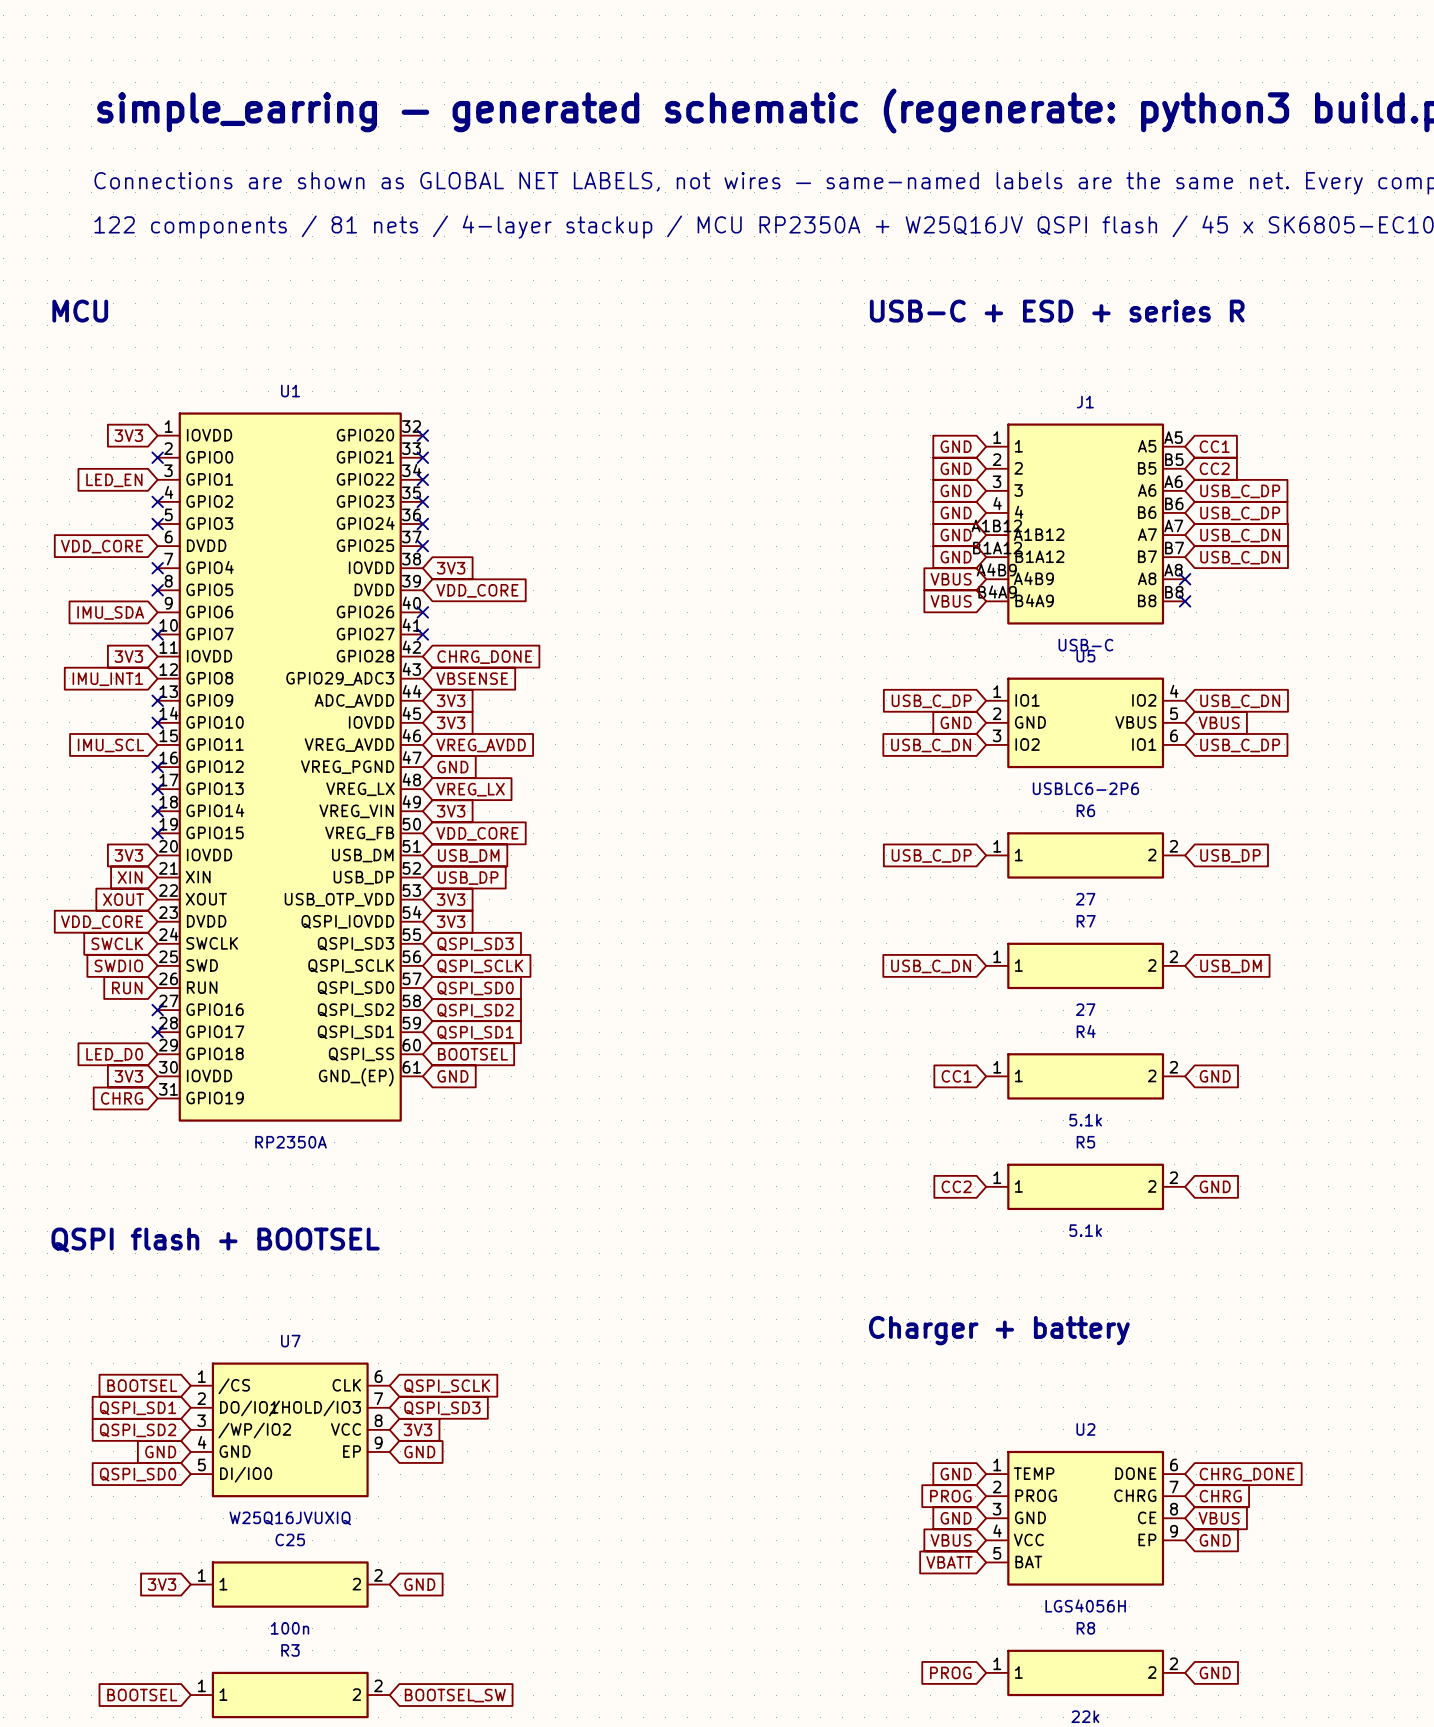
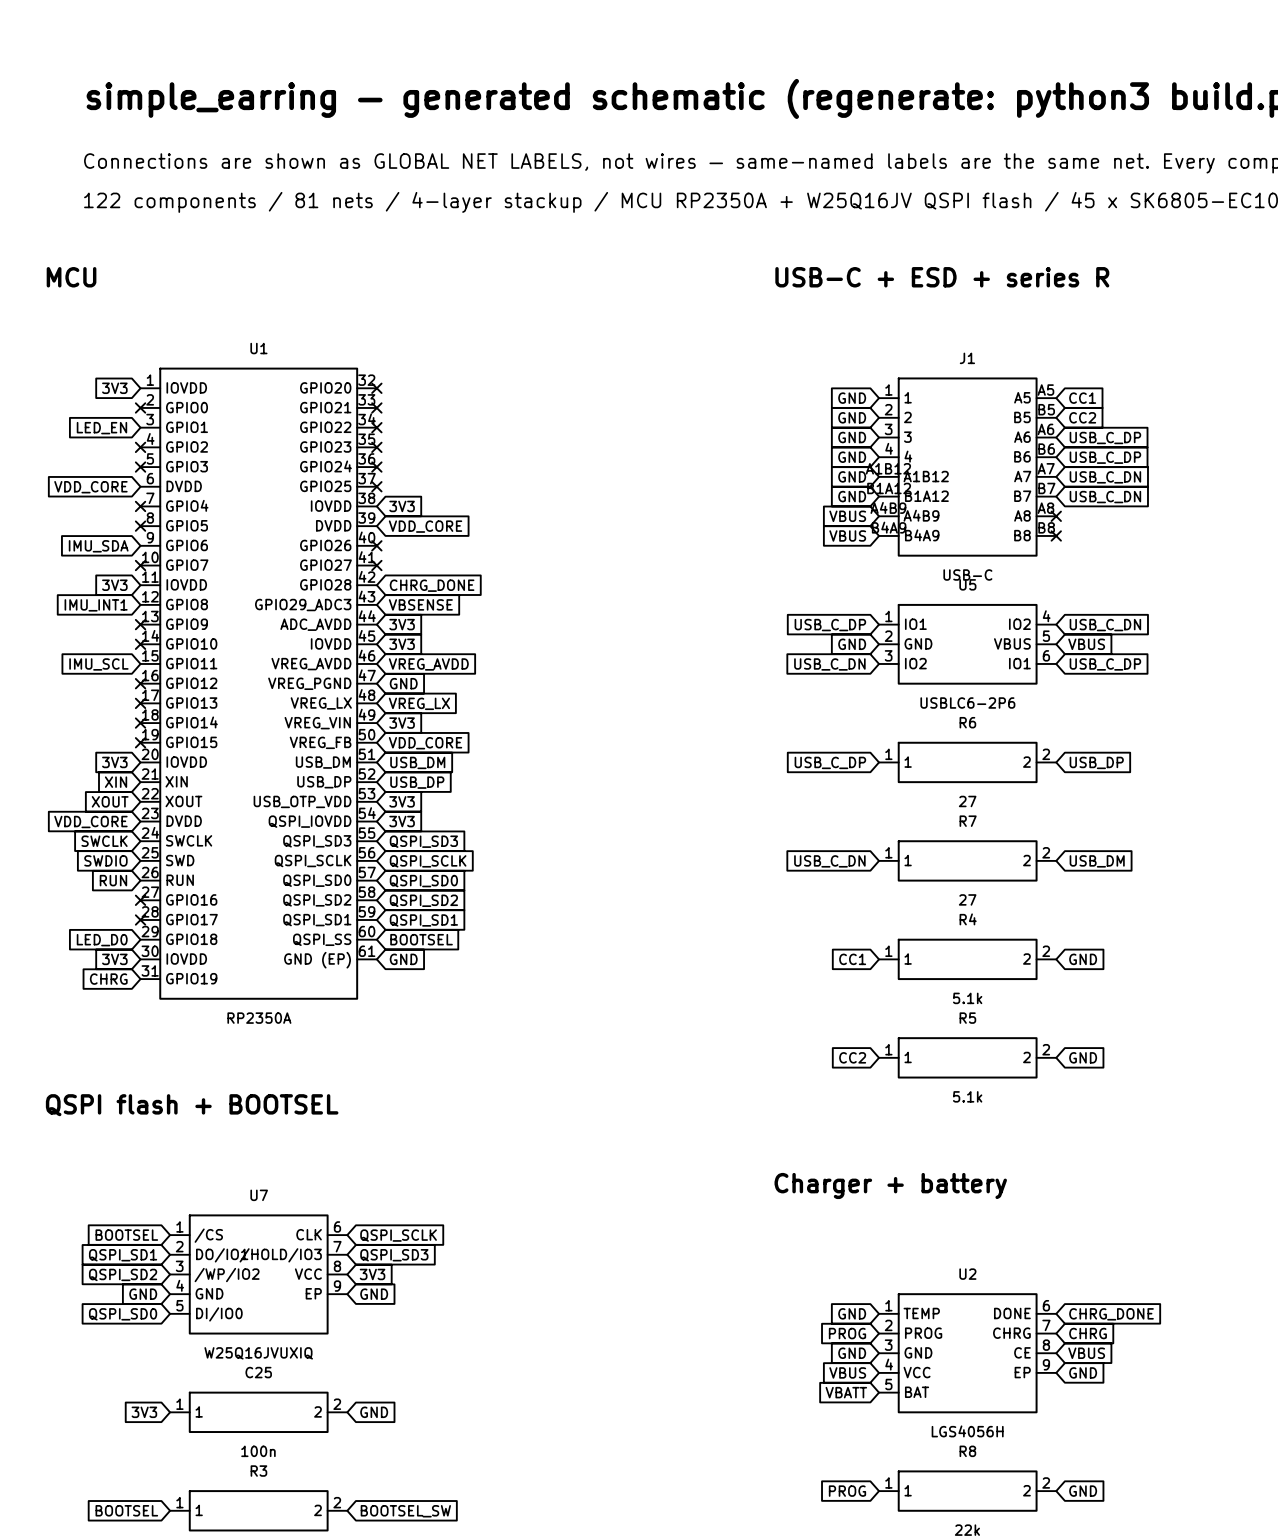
U1 pin name: GND_(EP) (356, 1077) -> GND (EP) (317, 960)

